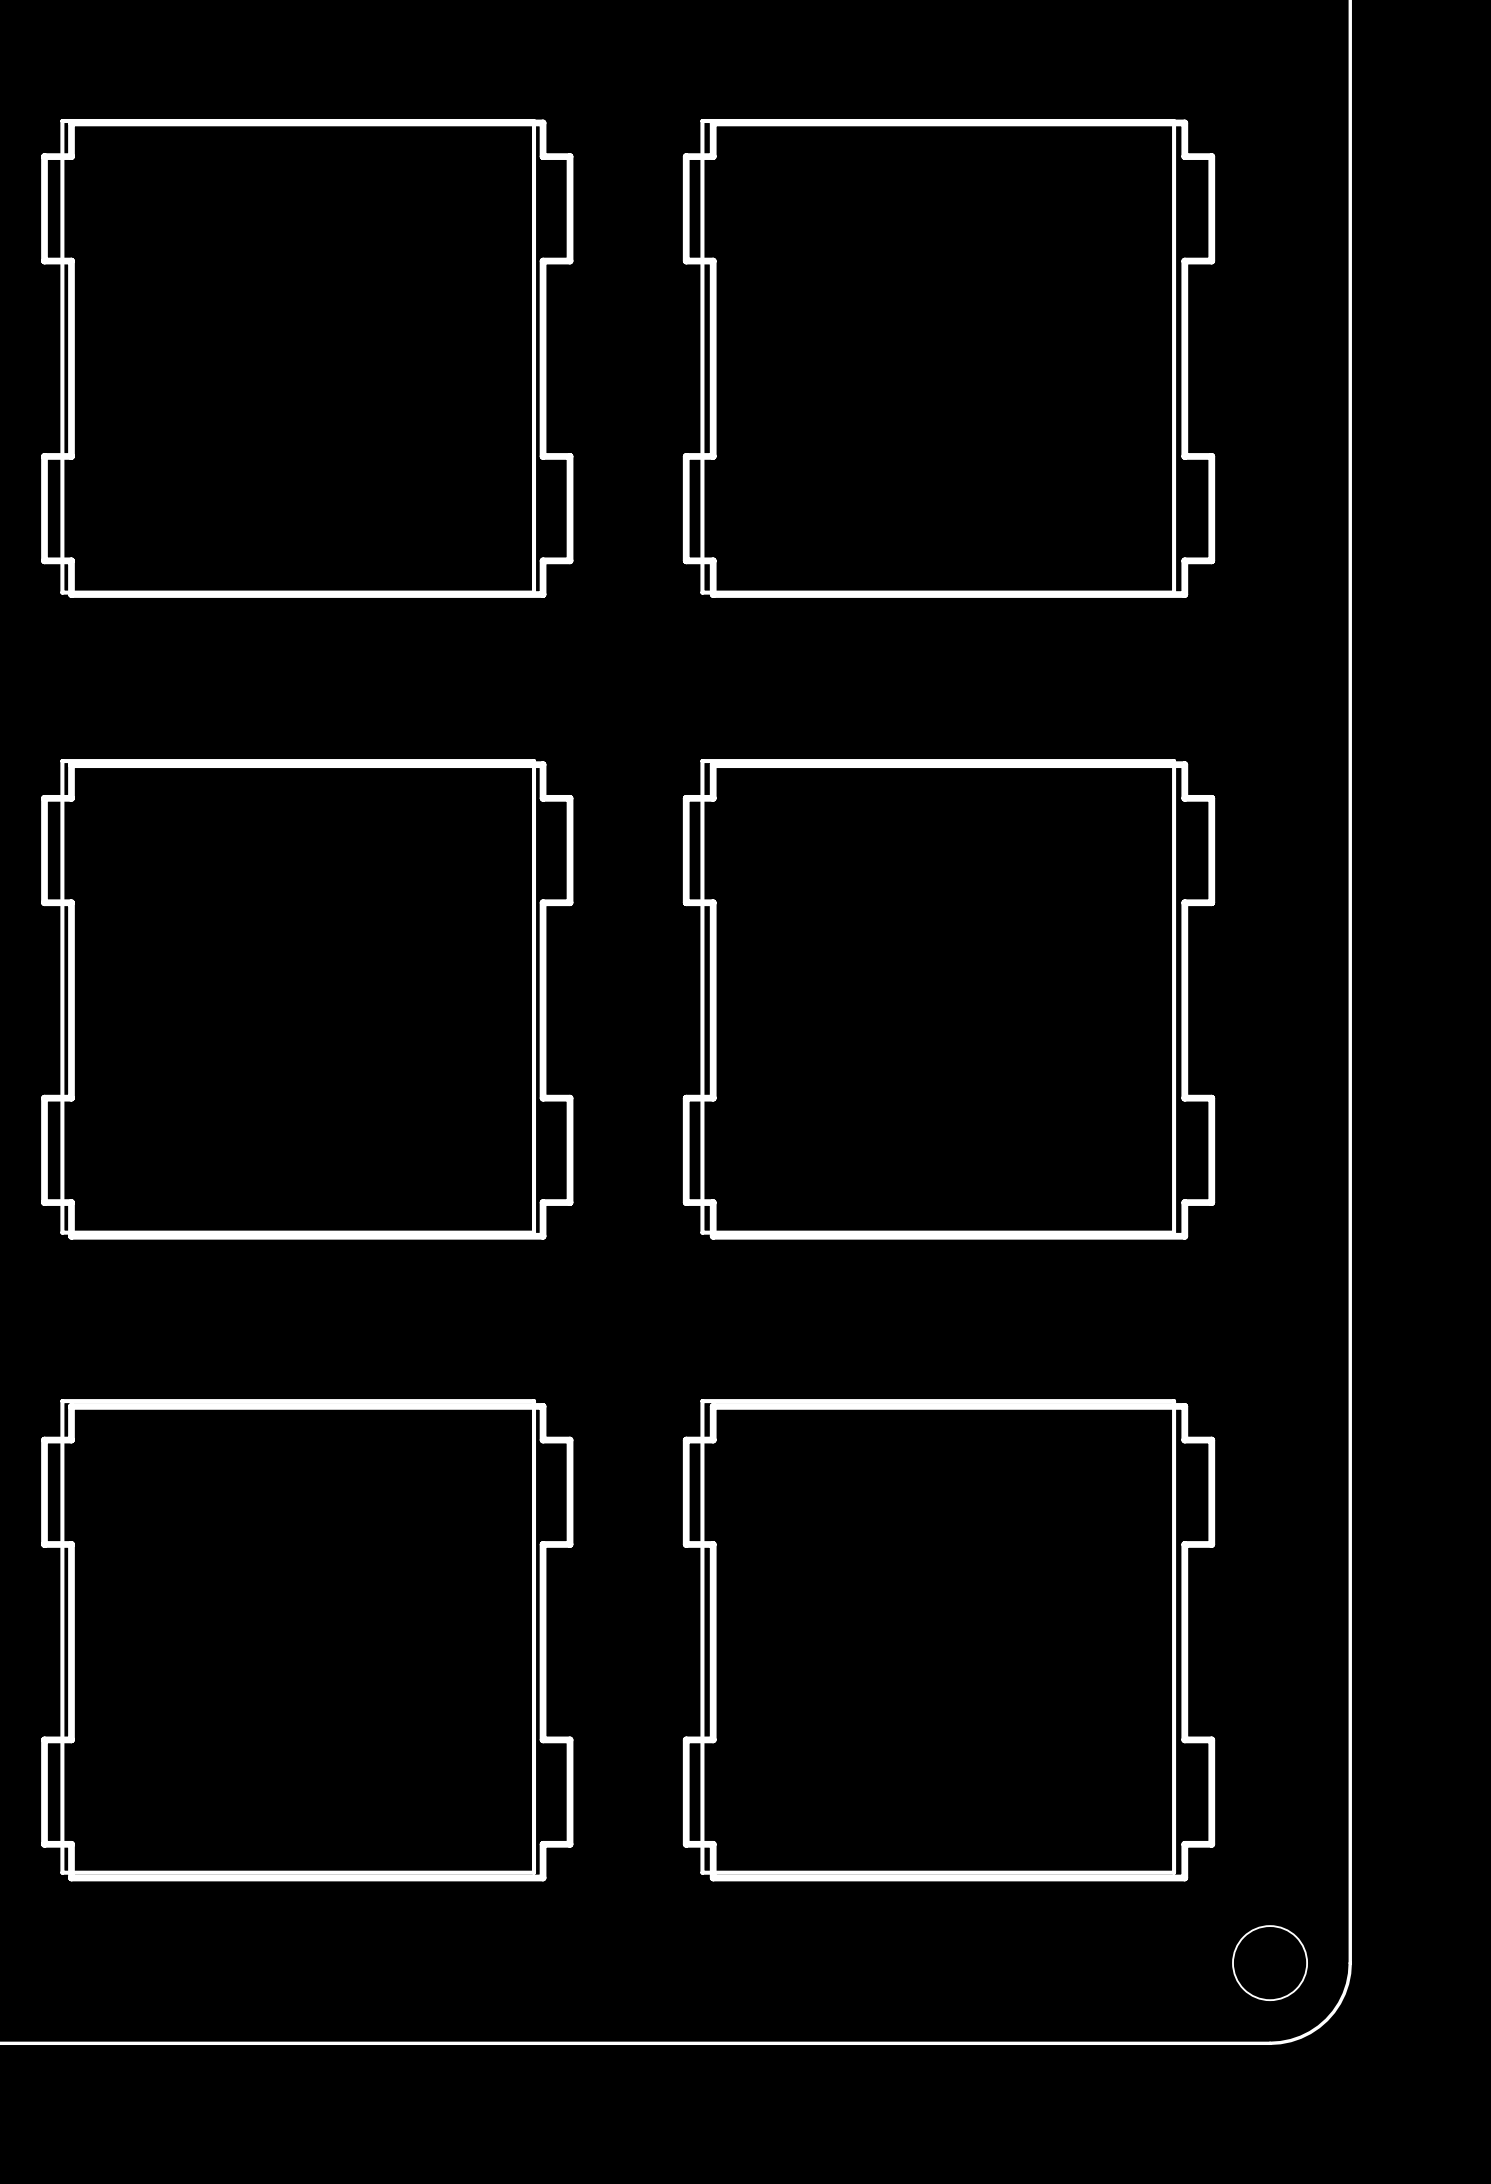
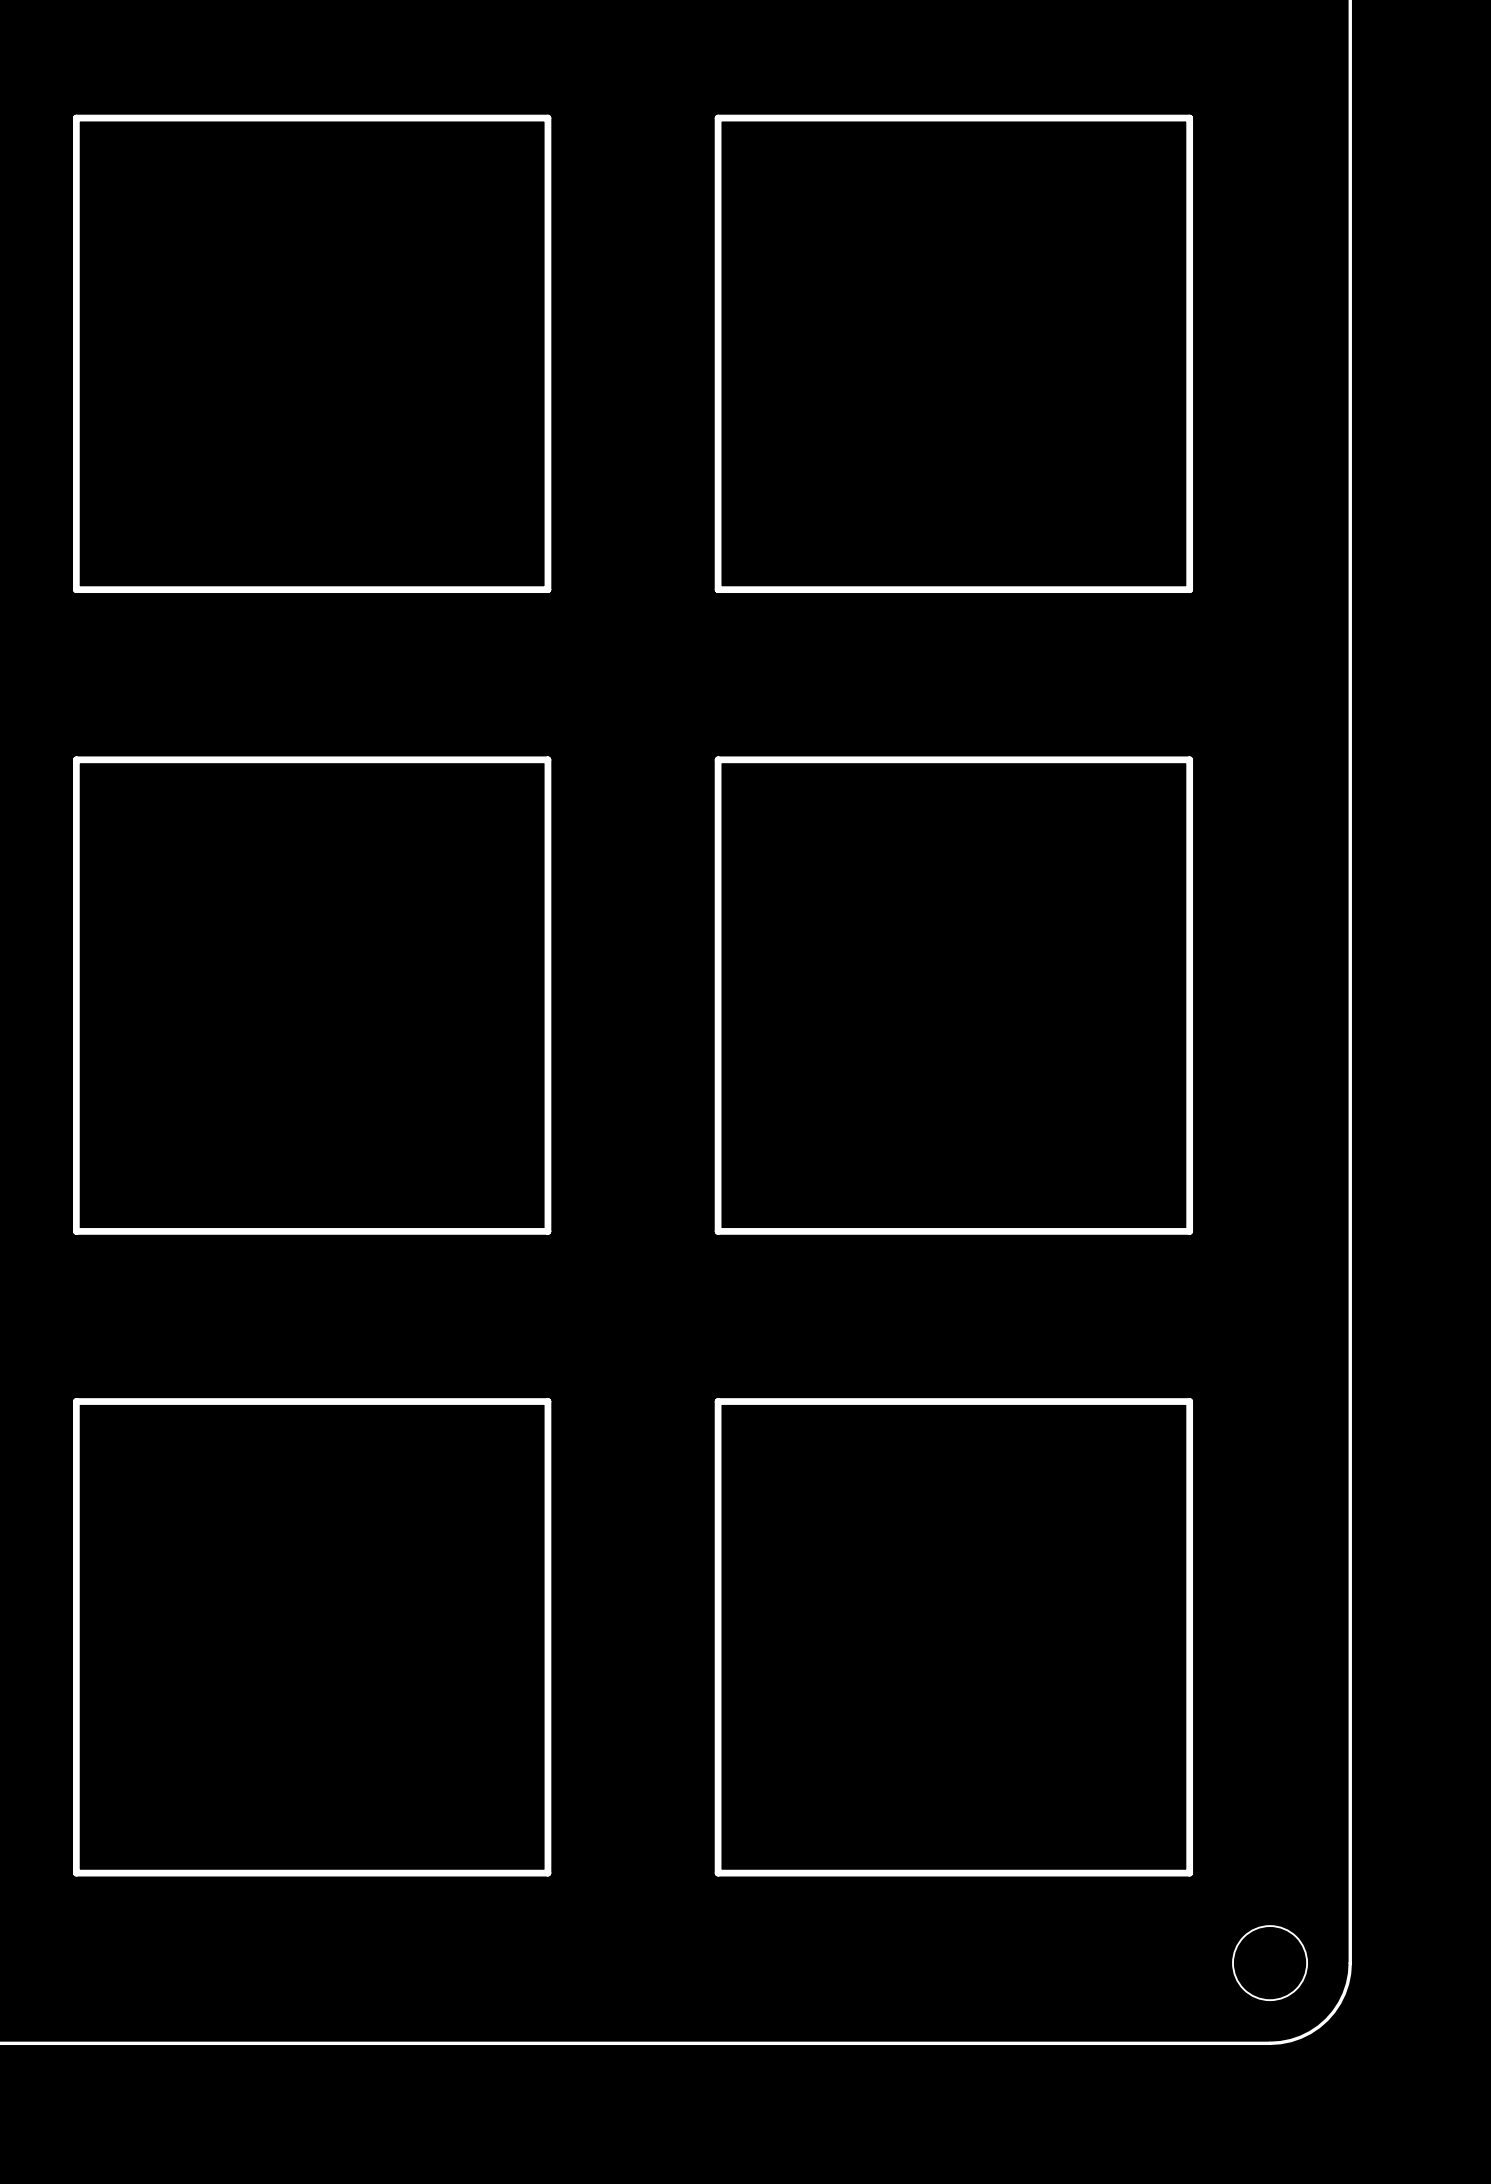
drawing: [60, 118, 537, 595] -> none
drawing: [700, 118, 1177, 595] -> none
board edge: (71, 122) (71, 156) (44, 156) (44, 261) (71, 261) (71, 456) (44, 456) (44, 560) (71, 560) (71, 594) (543, 594) (543, 560) (570, 560) (570, 456) (543, 456) (543, 261) (570, 261) (570, 156) (543, 156) (543, 122) (71, 122) -> (76, 118) (76, 589) (547, 589) (547, 118) (76, 118)
board edge: (713, 122) (713, 156) (686, 156) (686, 261) (713, 261) (713, 456) (686, 456) (686, 560) (713, 560) (713, 594) (1184, 594) (1184, 560) (1211, 560) (1211, 456) (1184, 456) (1184, 261) (1211, 261) (1211, 156) (1184, 156) (1184, 122) (713, 122) -> (718, 118) (718, 589) (1189, 589) (1189, 118) (718, 118)
drawing: [60, 759, 537, 1235] -> none
drawing: [700, 759, 1177, 1235] -> none
board edge: (71, 764) (71, 798) (44, 798) (44, 902) (71, 902) (71, 1098) (44, 1098) (44, 1202) (71, 1202) (71, 1236) (543, 1236) (543, 1202) (570, 1202) (570, 1098) (543, 1098) (543, 902) (570, 902) (570, 798) (543, 798) (543, 764) (71, 764) -> (76, 759) (76, 1231) (547, 1231) (547, 759) (76, 759)
board edge: (713, 764) (713, 798) (686, 798) (686, 902) (713, 902) (713, 1098) (686, 1098) (686, 1202) (713, 1202) (713, 1236) (1184, 1236) (1184, 1202) (1211, 1202) (1211, 1098) (1184, 1098) (1184, 902) (1211, 902) (1211, 798) (1184, 798) (1184, 764) (713, 764) -> (718, 759) (718, 1231) (1189, 1231) (1189, 759) (718, 759)
drawing: [60, 1399, 537, 1875] -> none
drawing: [700, 1399, 1177, 1875] -> none
board edge: (71, 1406) (71, 1440) (44, 1440) (44, 1544) (71, 1544) (71, 1739) (44, 1739) (44, 1844) (71, 1844) (71, 1878) (543, 1878) (543, 1844) (570, 1844) (570, 1739) (543, 1739) (543, 1544) (570, 1544) (570, 1440) (543, 1440) (543, 1406) (71, 1406) -> (76, 1401) (76, 1873) (547, 1873) (547, 1401) (76, 1401)
board edge: (713, 1406) (713, 1440) (686, 1440) (686, 1544) (713, 1544) (713, 1739) (686, 1739) (686, 1844) (713, 1844) (713, 1878) (1184, 1878) (1184, 1844) (1211, 1844) (1211, 1739) (1184, 1739) (1184, 1544) (1211, 1544) (1211, 1440) (1184, 1440) (1184, 1406) (713, 1406) -> (718, 1401) (718, 1873) (1189, 1873) (1189, 1401) (718, 1401)

